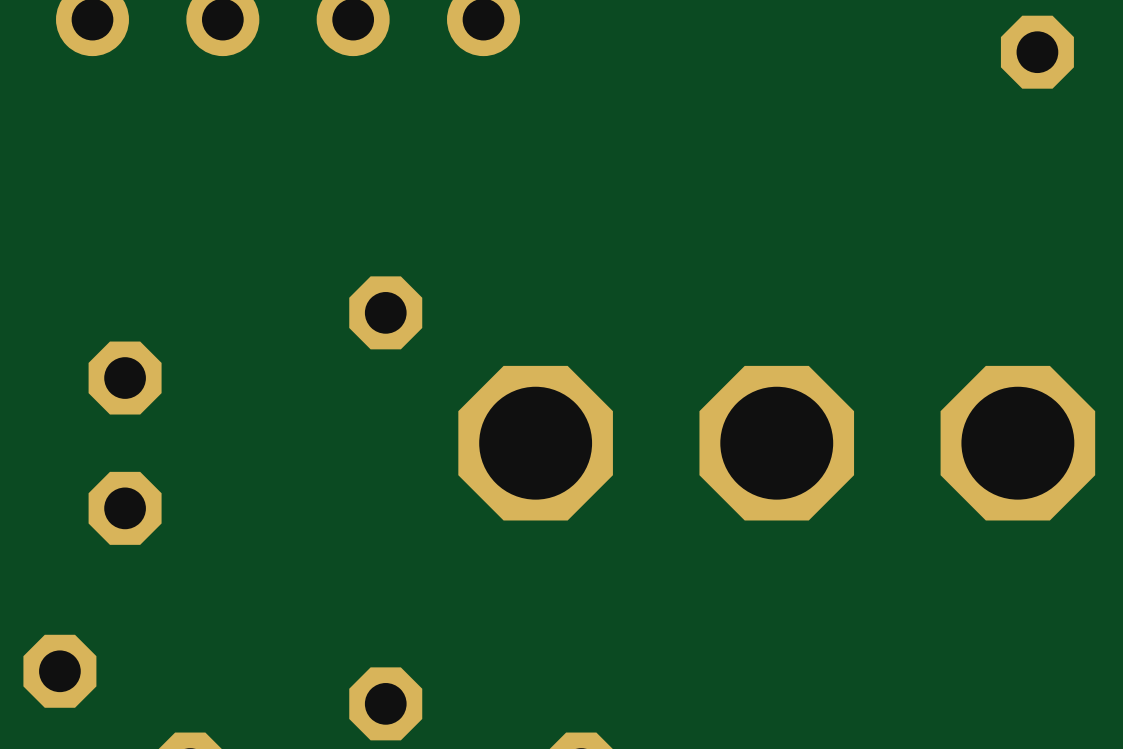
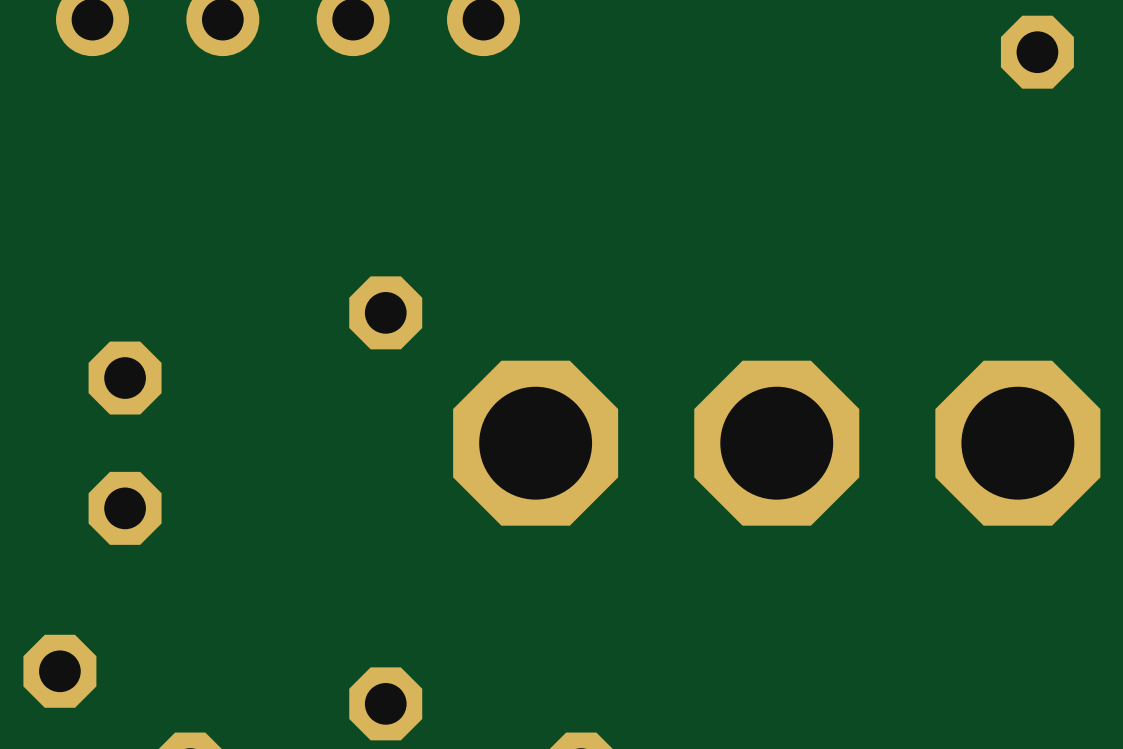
part footprint: [458, 365, 1096, 521] -> [453, 360, 1101, 526]

